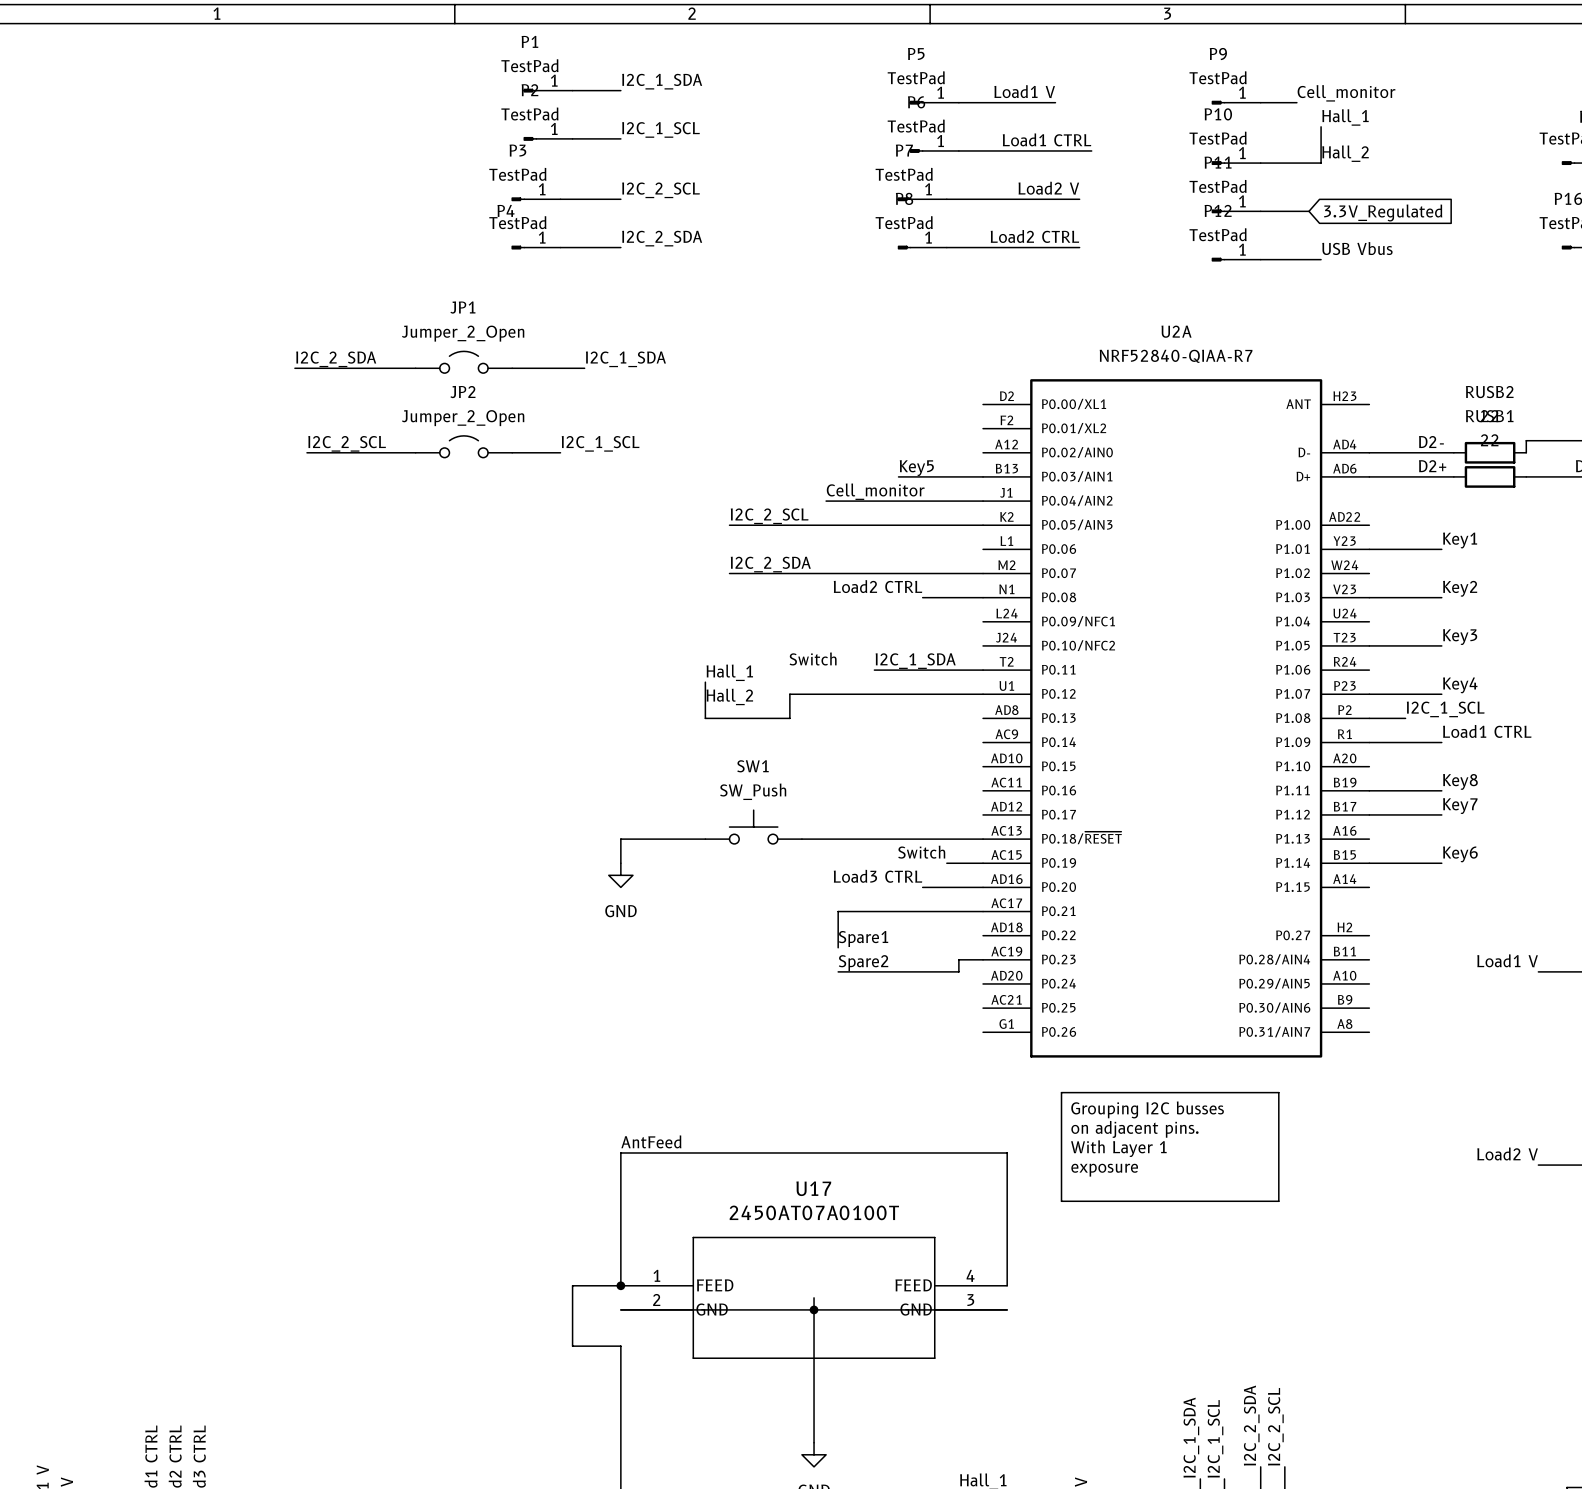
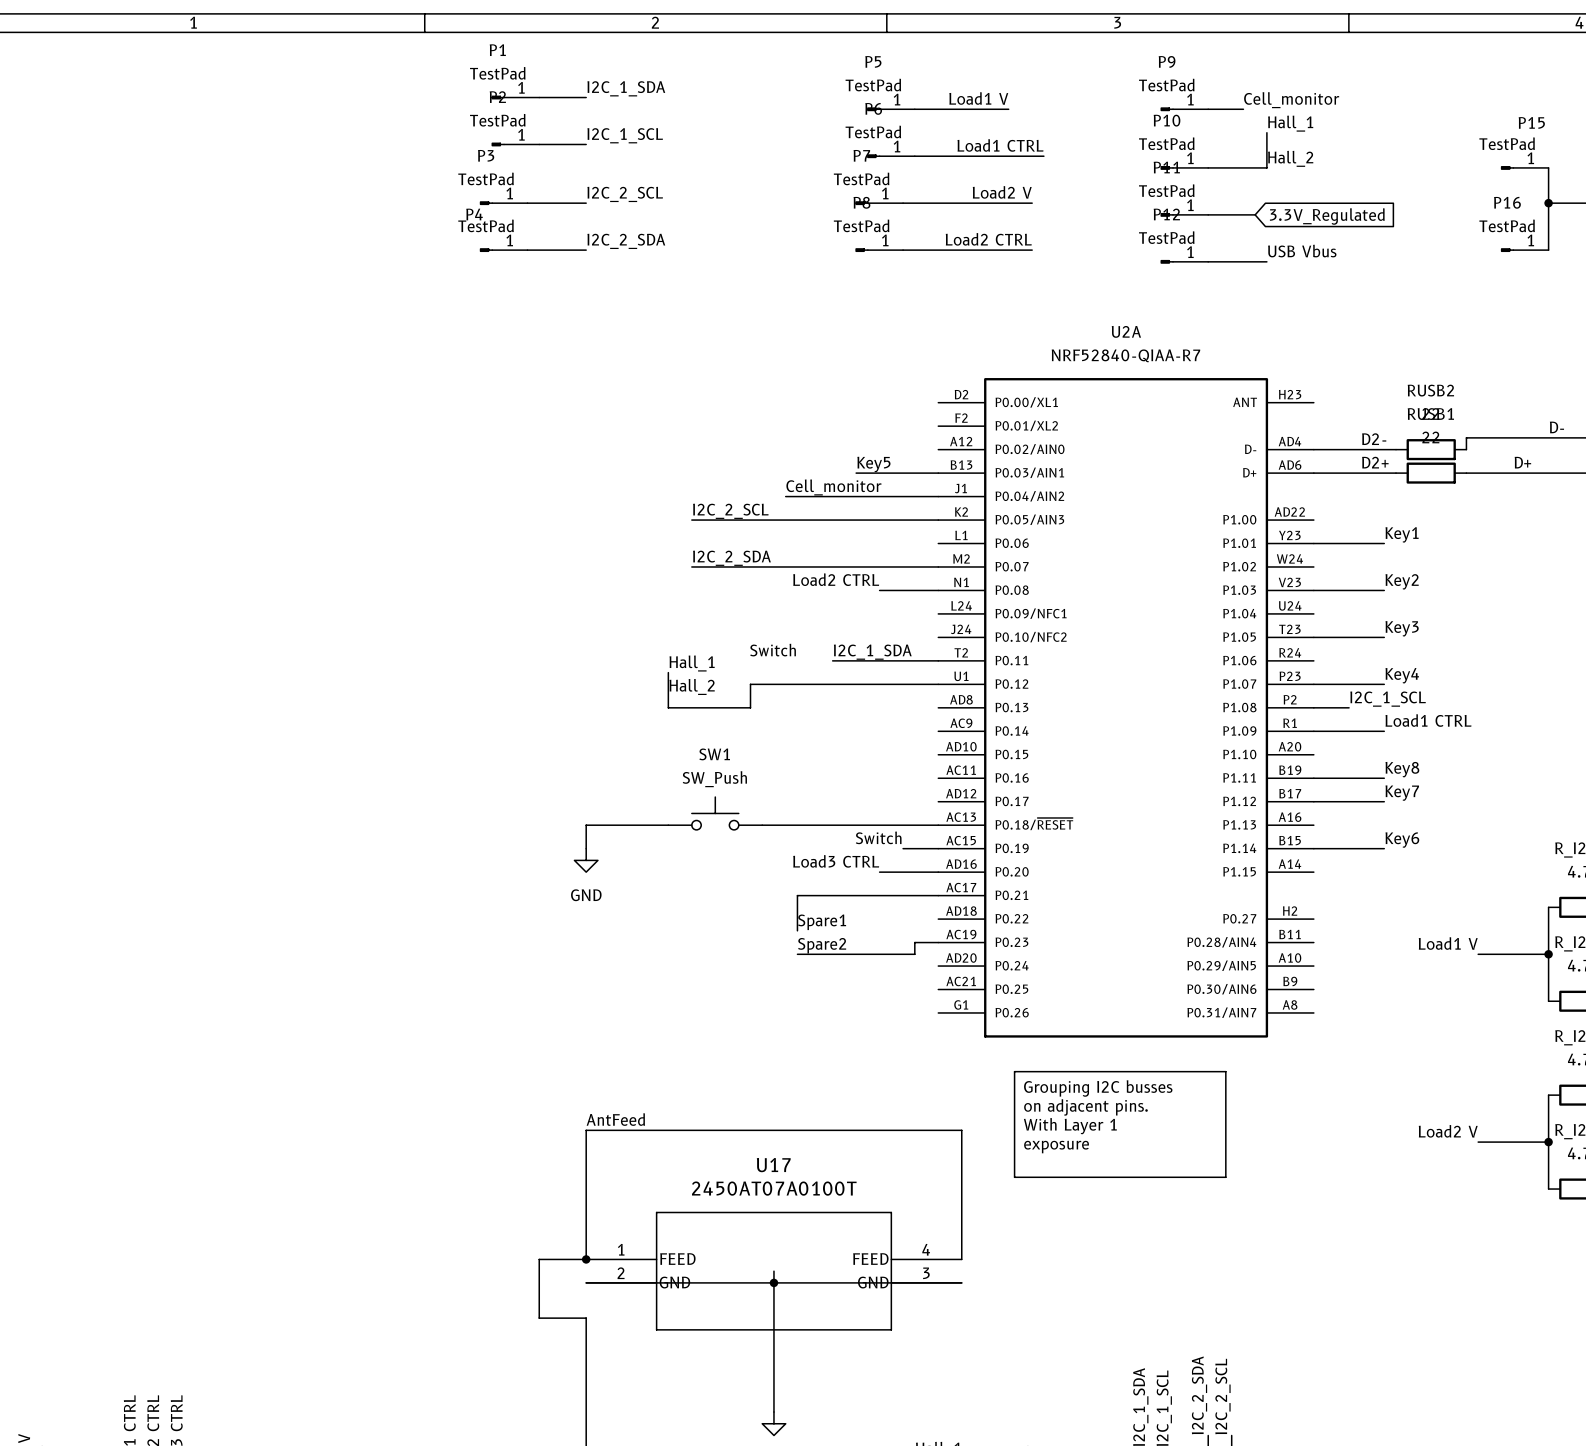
label: I2C_2_SDA (336, 359) -> none
label: I2C_1_SDA (625, 359) -> none
JP1: Jumper_2_Open (463, 362) -> none
wire: (294, 368) (415, 368) -> none
wire: (512, 368) (584, 368) -> none
label: I2C_2_SCL (347, 443) -> none
label: I2C_1_SCL (600, 443) -> none
JP2: Jumper_2_Open (463, 446) -> none
wire: (306, 452) (415, 452) -> none
wire: (512, 452) (560, 452) -> none

